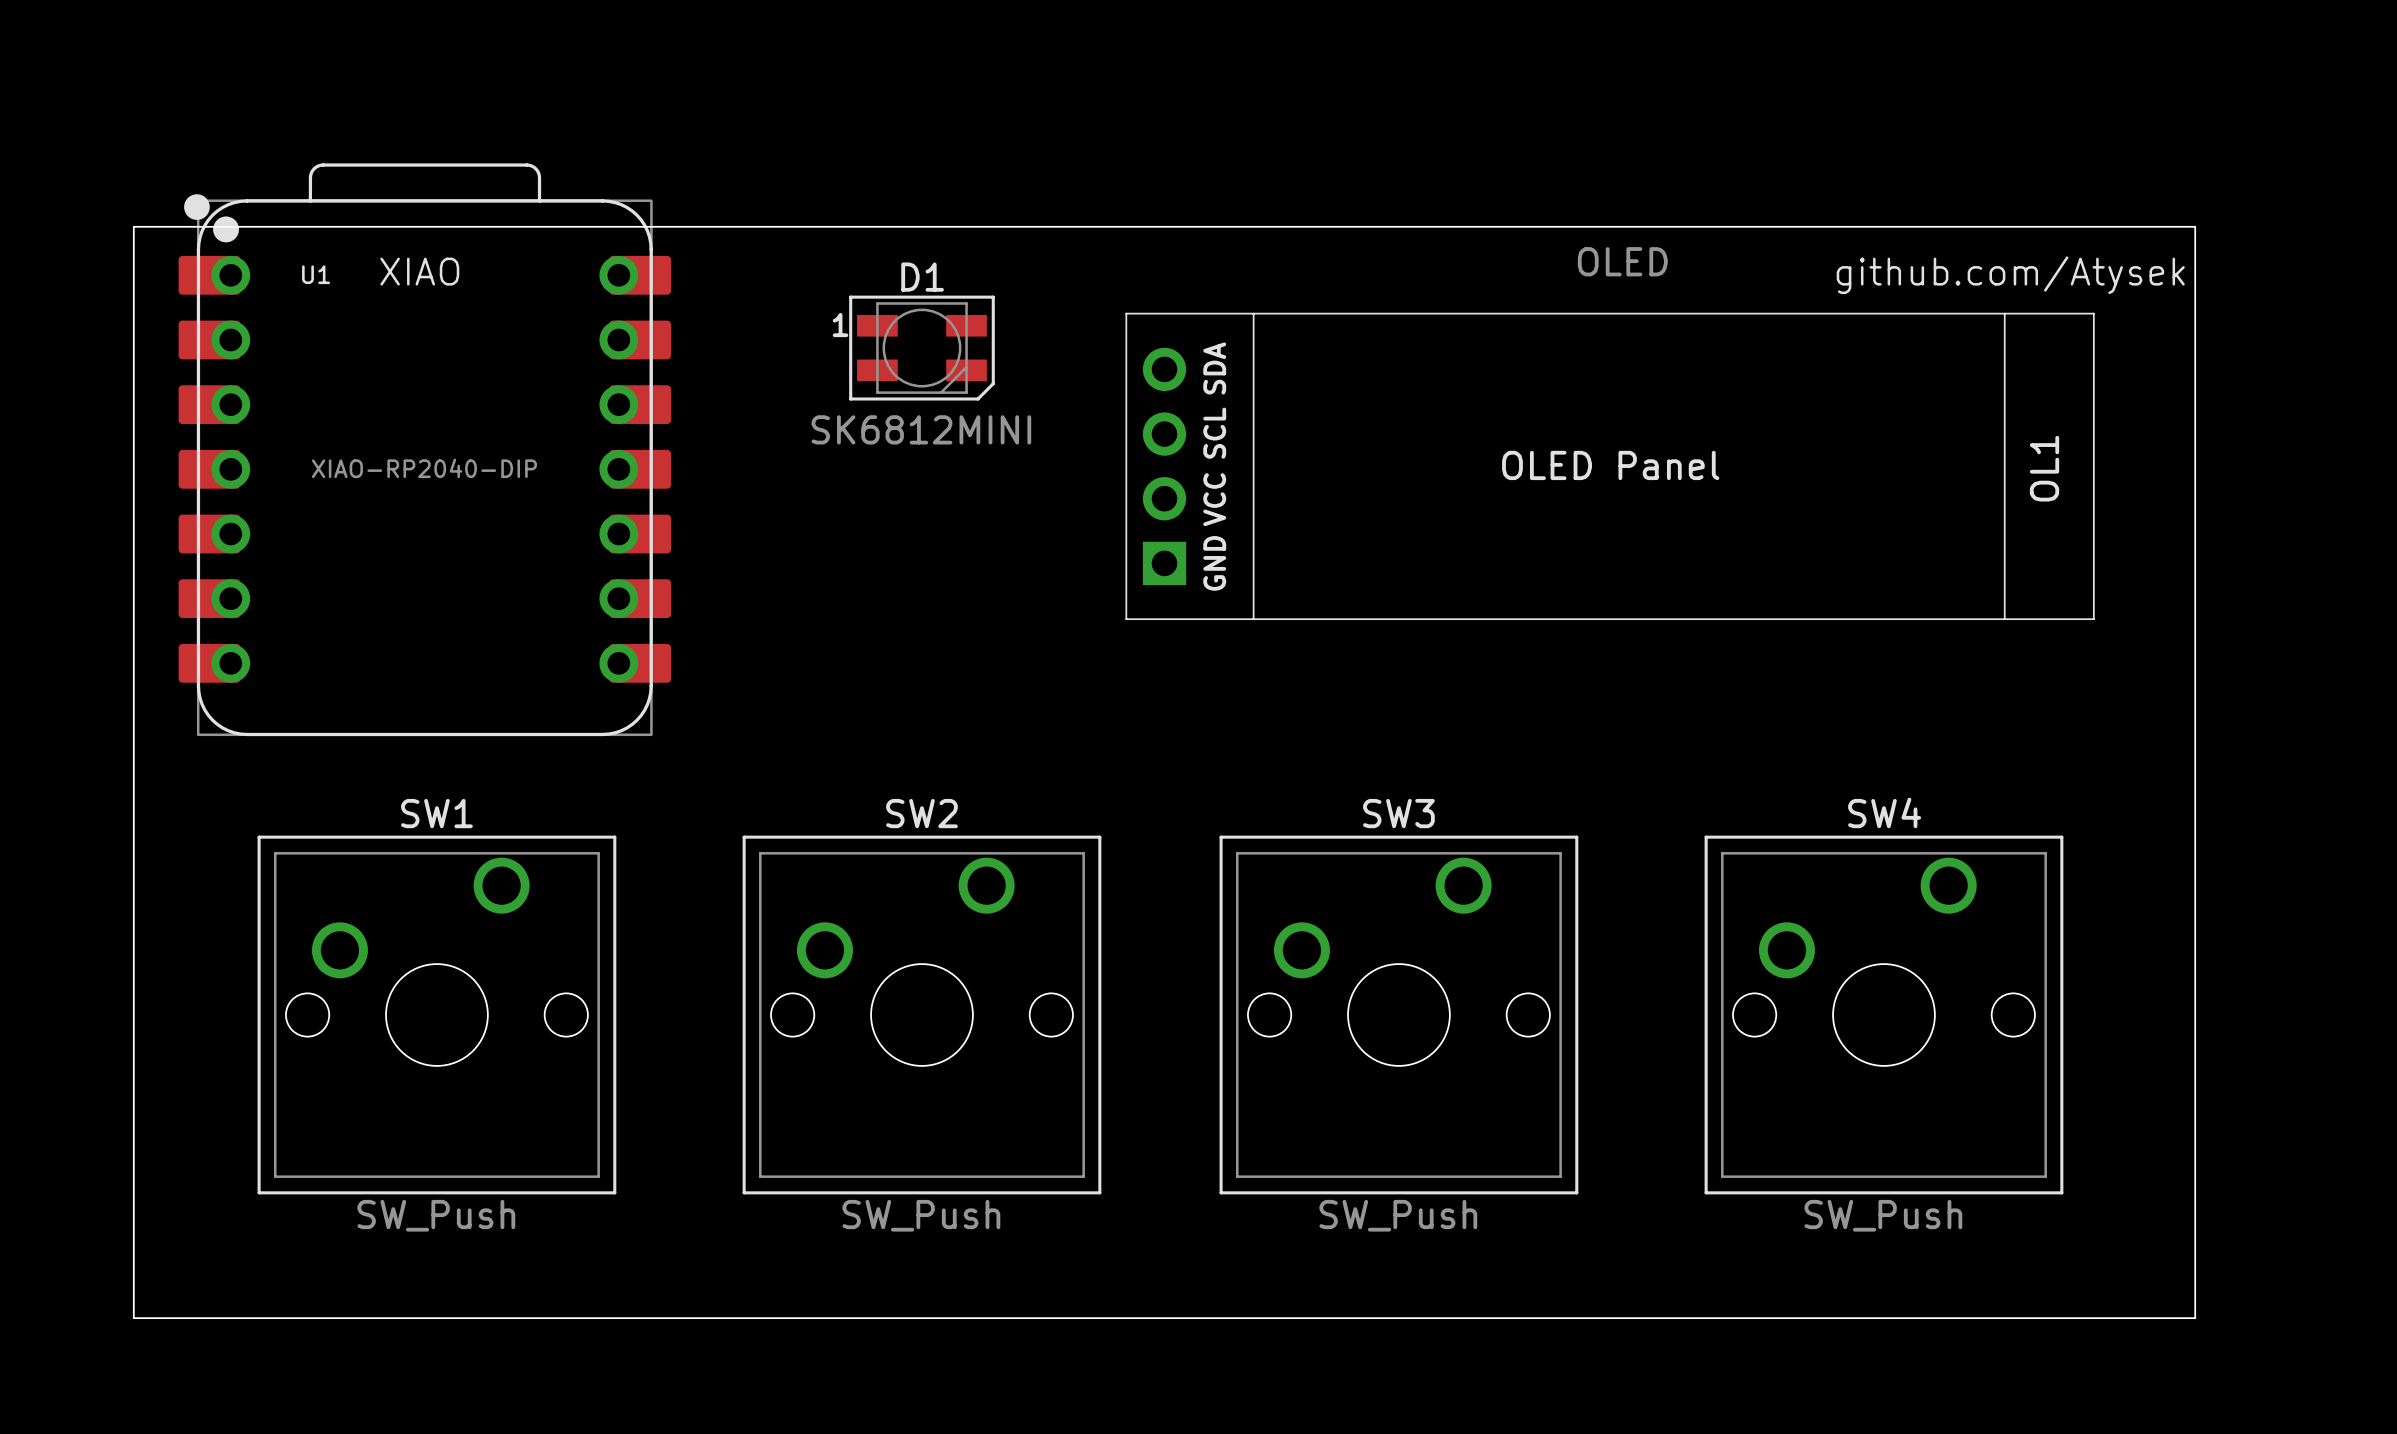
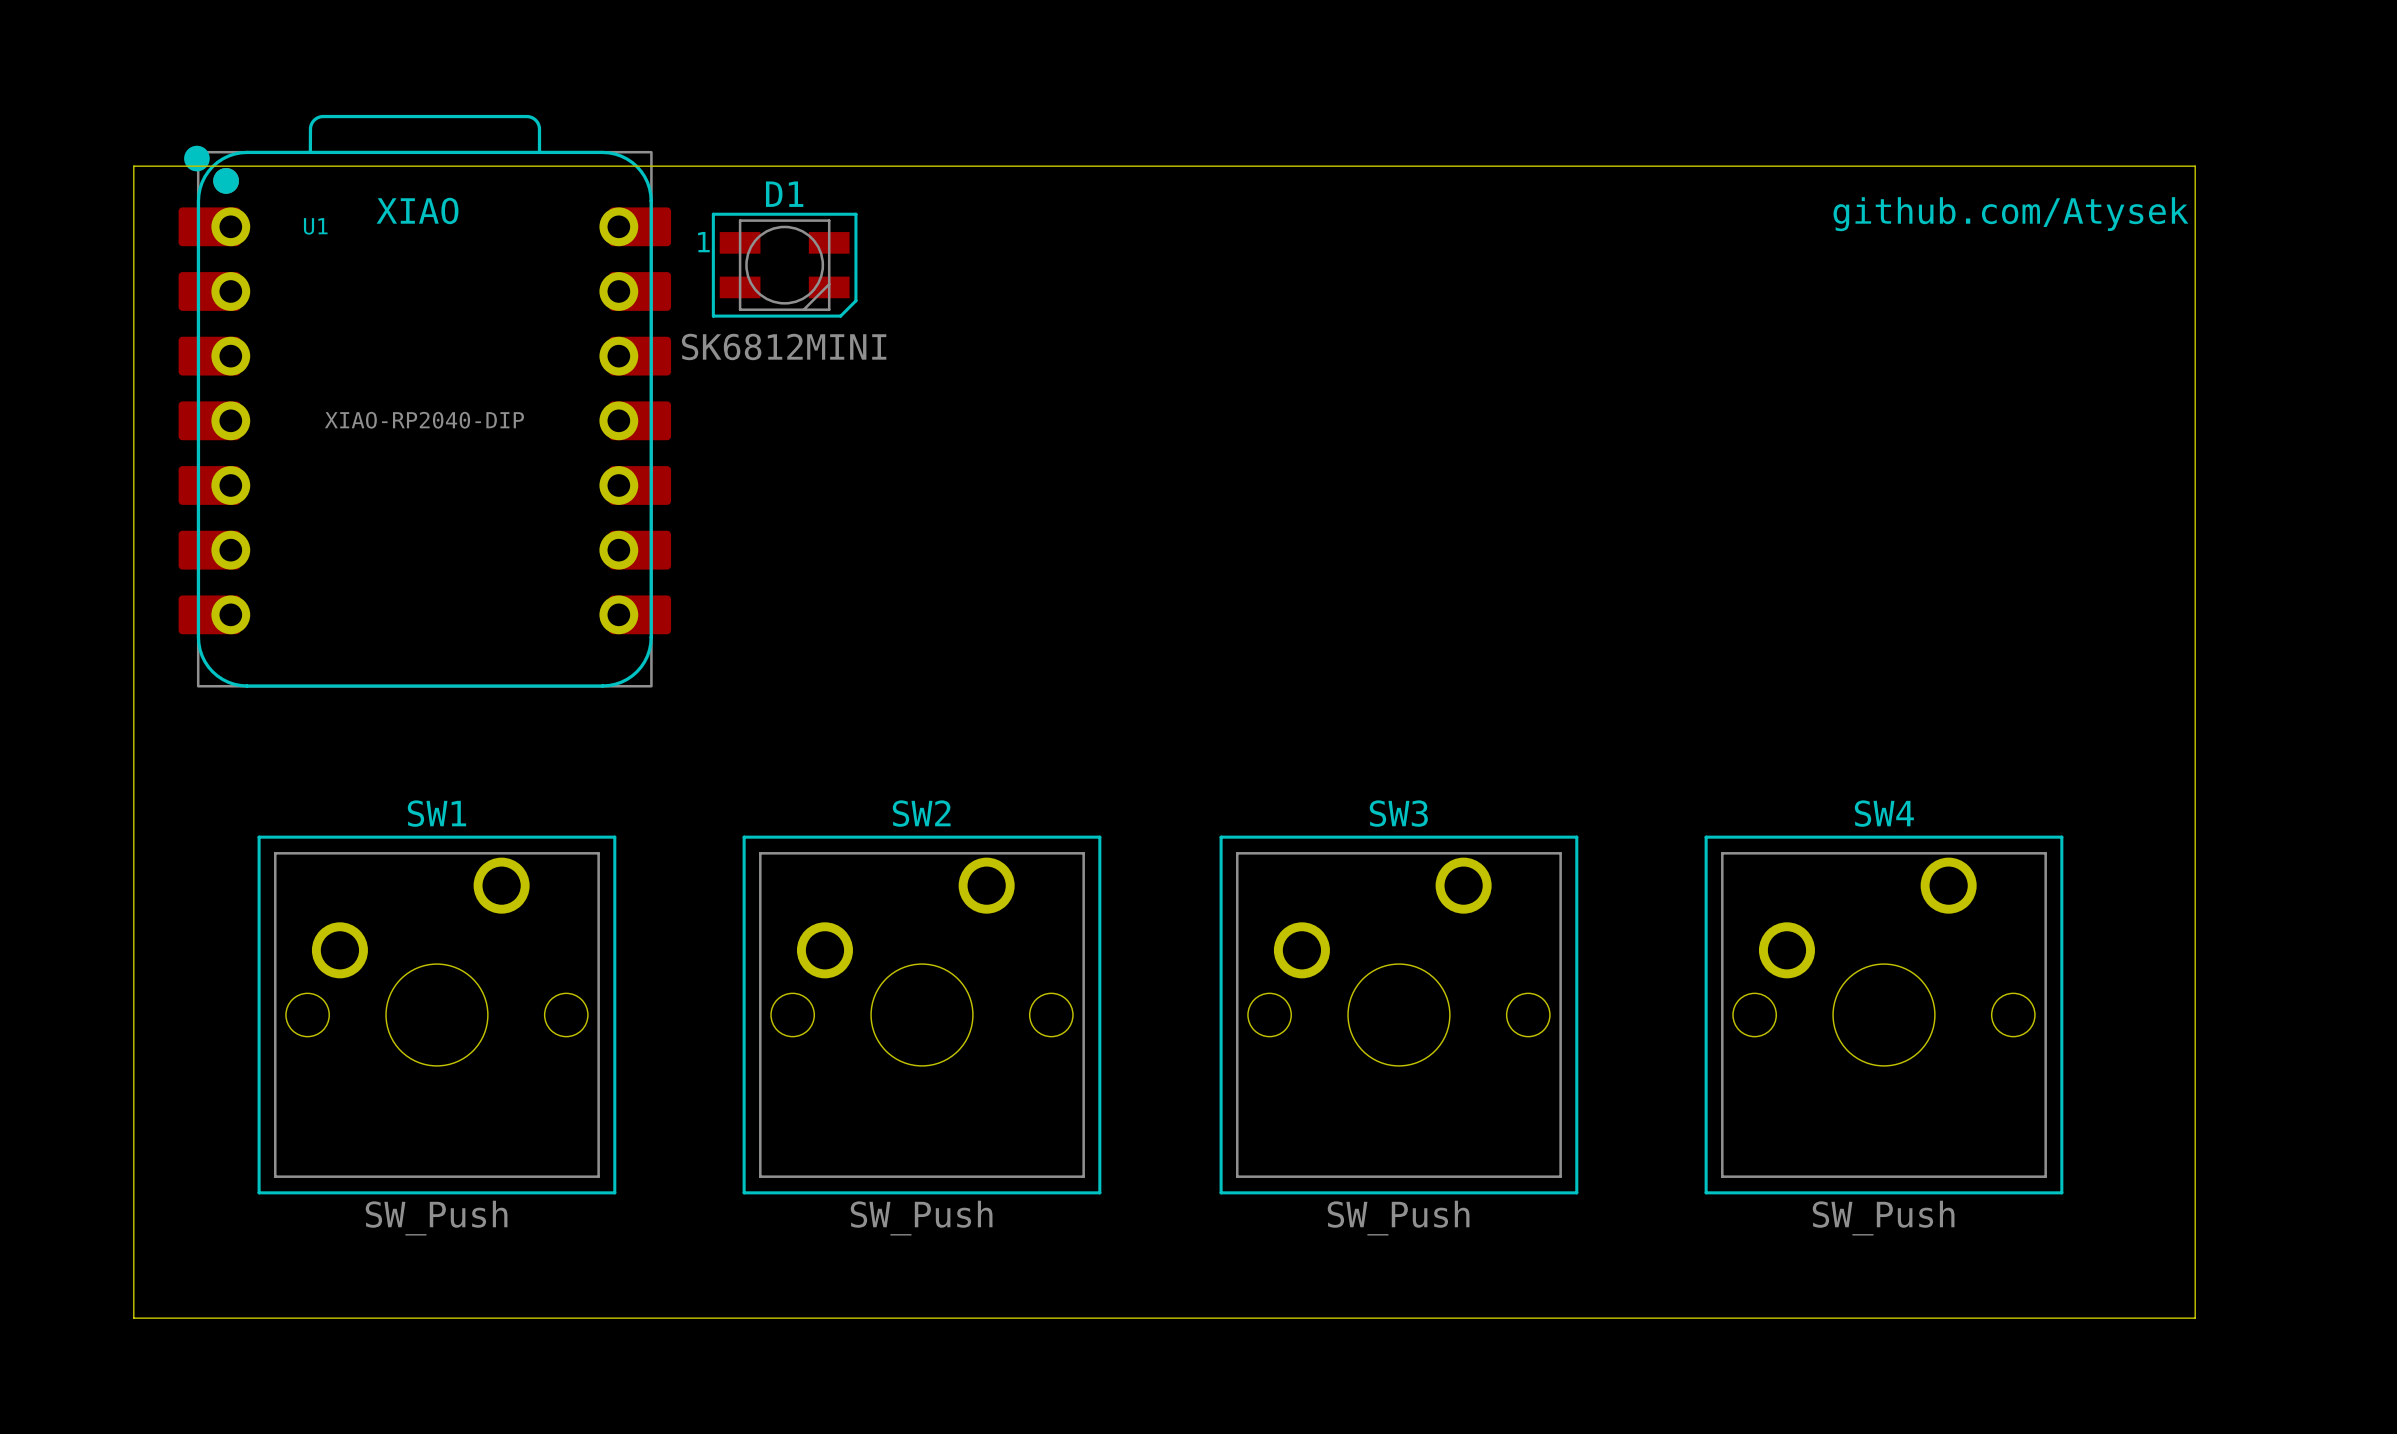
board edge: (133, 226) (2195, 226) -> (133, 226) (133, 166) (2195, 166) (2195, 226)
text position: XIAO (419, 271) -> XIAO (417, 210)
text position: github.com/Atysek (2010, 275) -> github.com/Atysek (2010, 214)
D1 position: (921, 348) -> (784, 265)
U1 position: (424, 449) -> (424, 401)
OL1: OLED (1610, 466) -> none

